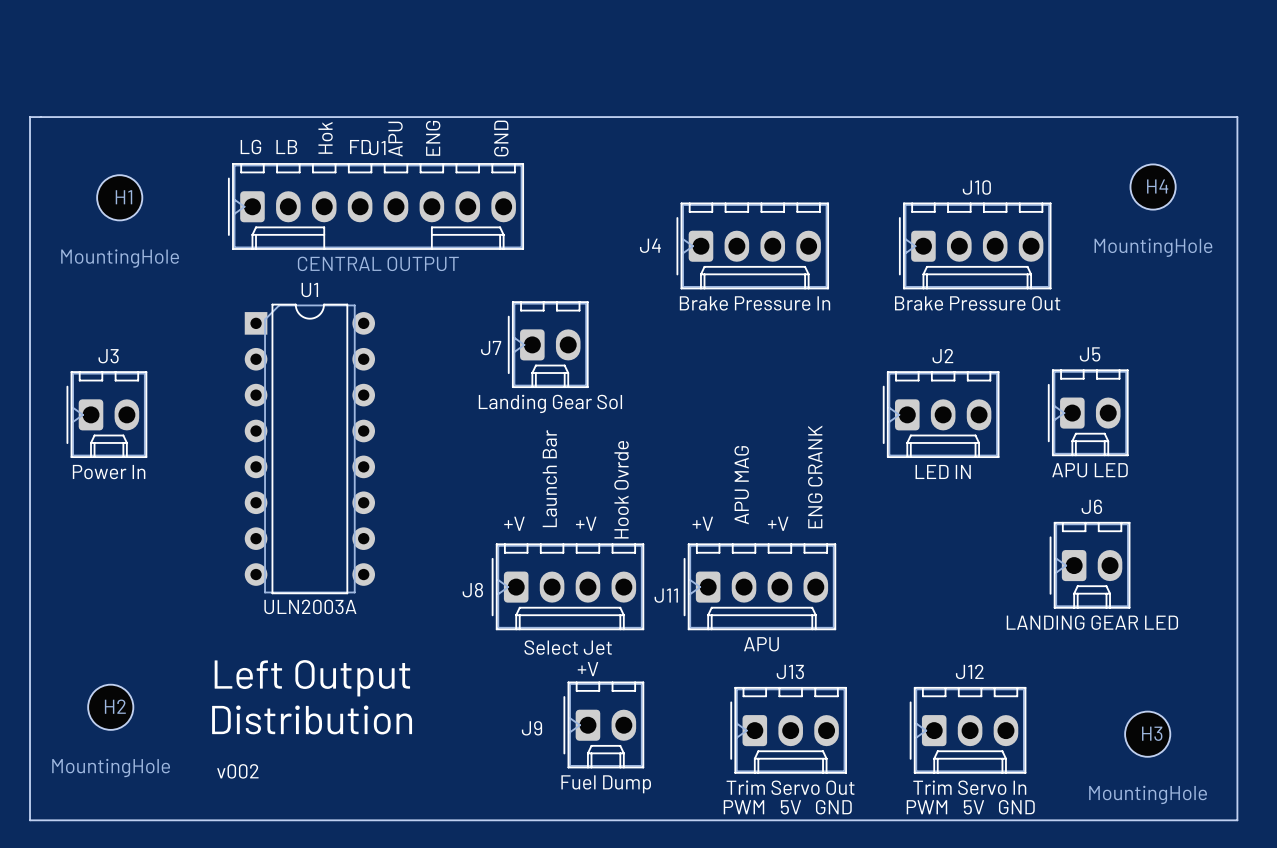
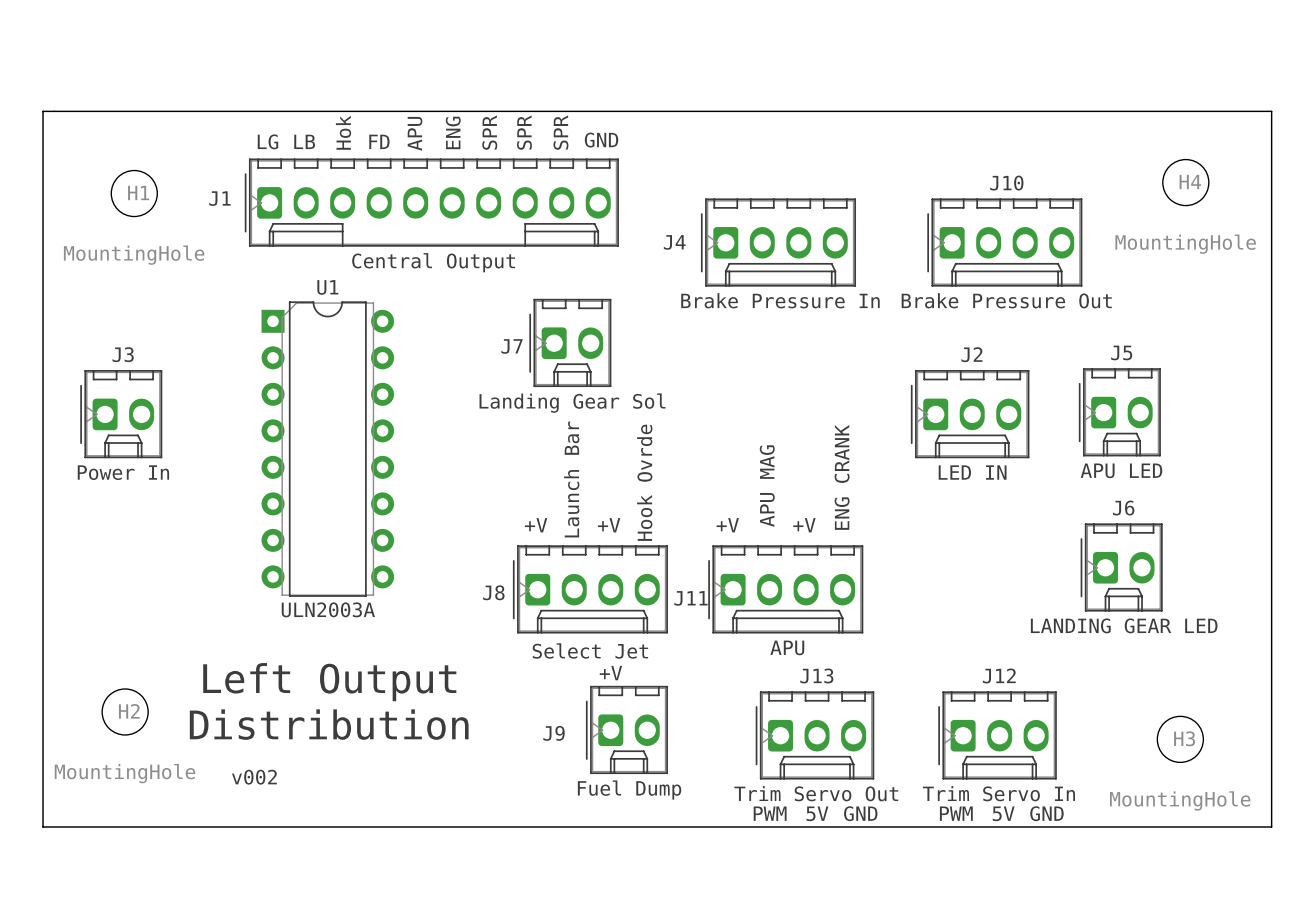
text: none -> SPR (489, 132)
text: GND (501, 138) -> SPR (524, 132)
text: none -> SPR (560, 132)
text: none -> GND (601, 140)
J1 name position: J1 (377, 148) -> J1 (219, 198)
J1 footprint: [228, 163, 524, 250] -> [244, 158, 619, 247]
J1 value: CENTRAL OUTPUT (378, 263) -> Central Output (433, 262)

